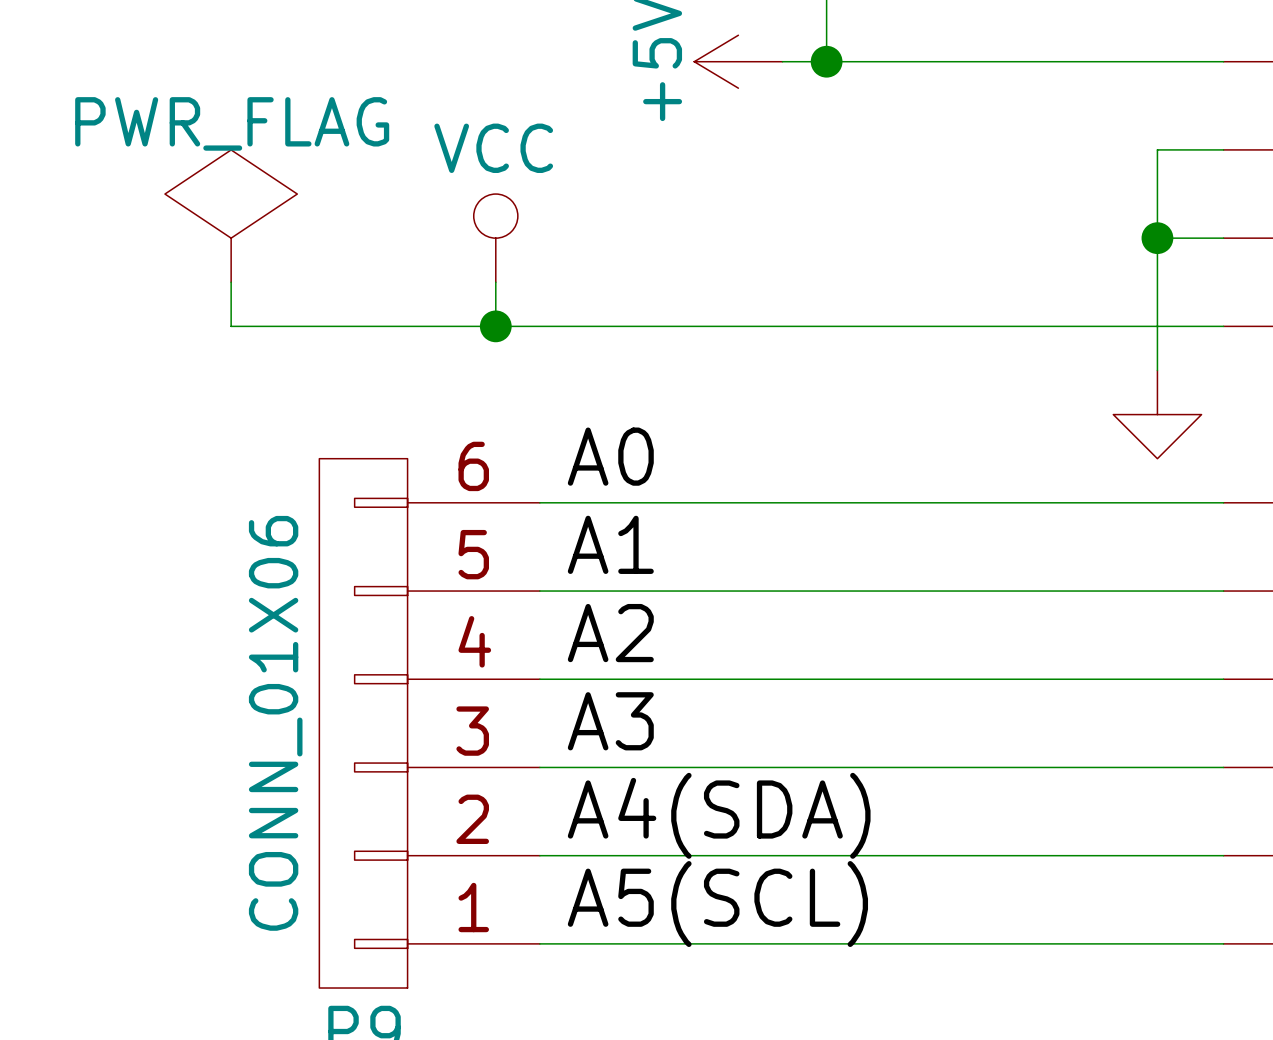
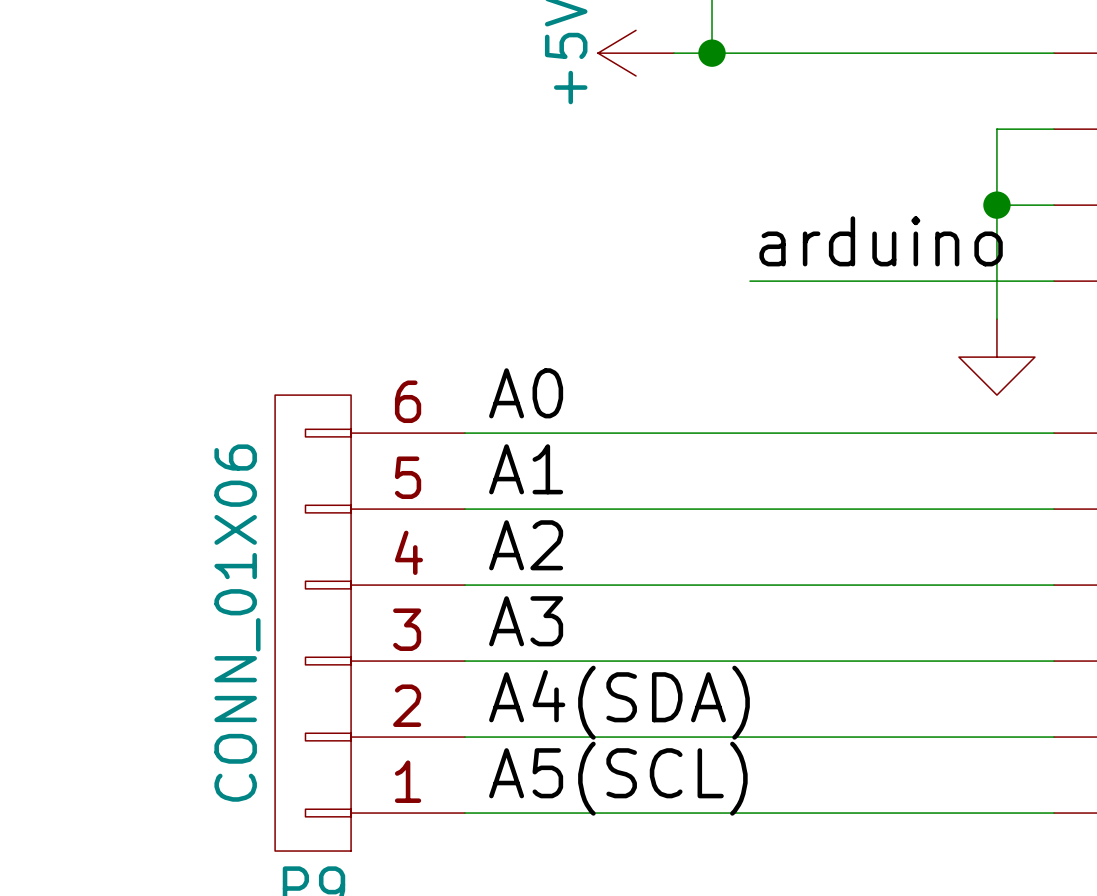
power symbol: PWR_FLAG (231, 216) -> none
power symbol: VCC (495, 238) -> none
label: none -> arduino (881, 241)
wire: (231, 282) (231, 326) (870, 326) -> none
wire: (495, 282) (495, 326) -> none
junction: (495, 326) -> none

